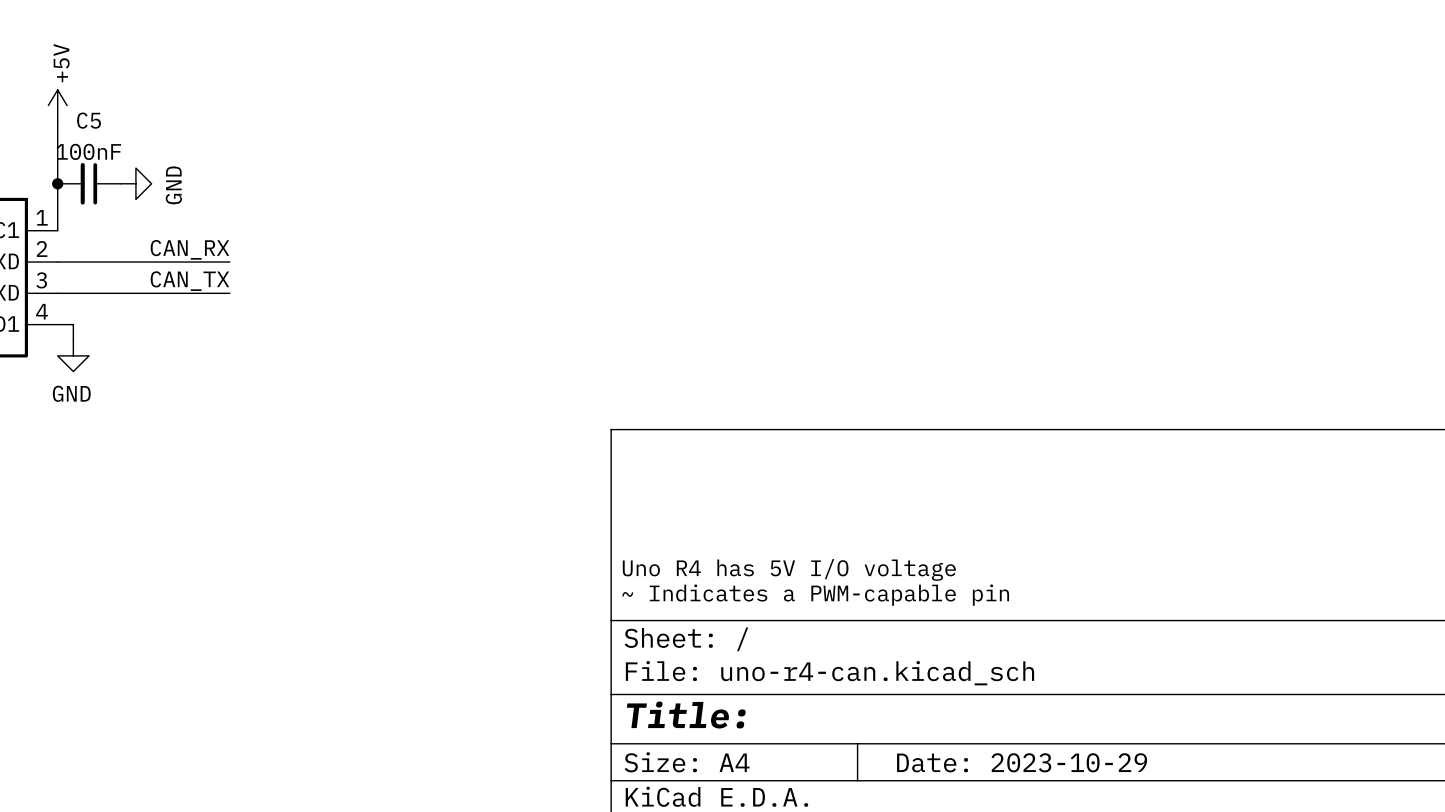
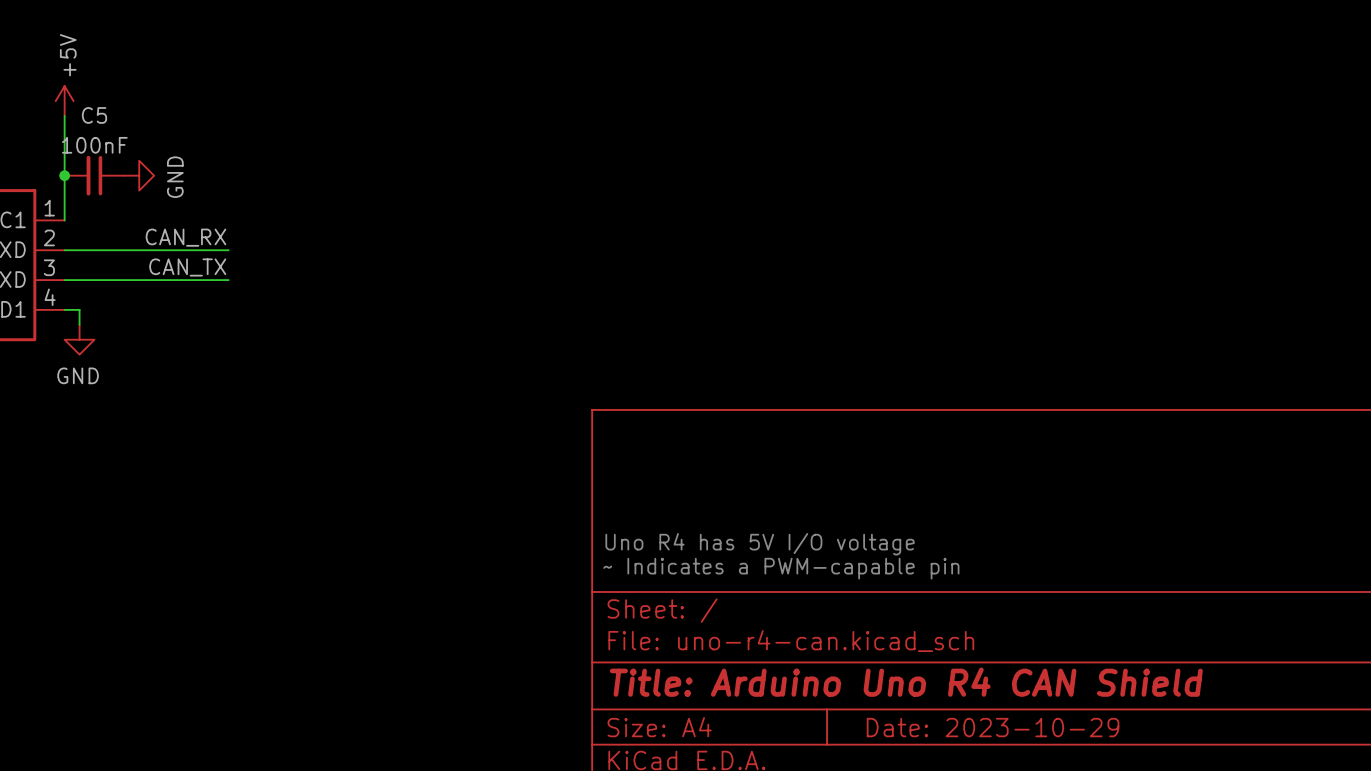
title block: Title: (686, 715) -> Title: Arduino Uno R4 CAN Shield (906, 682)

